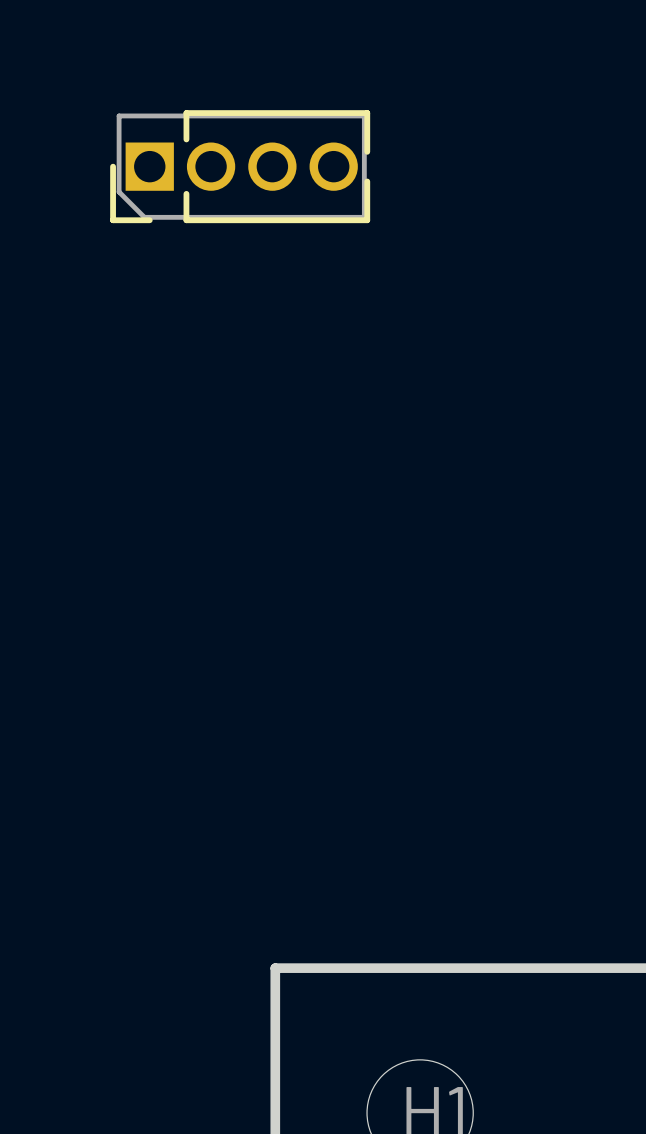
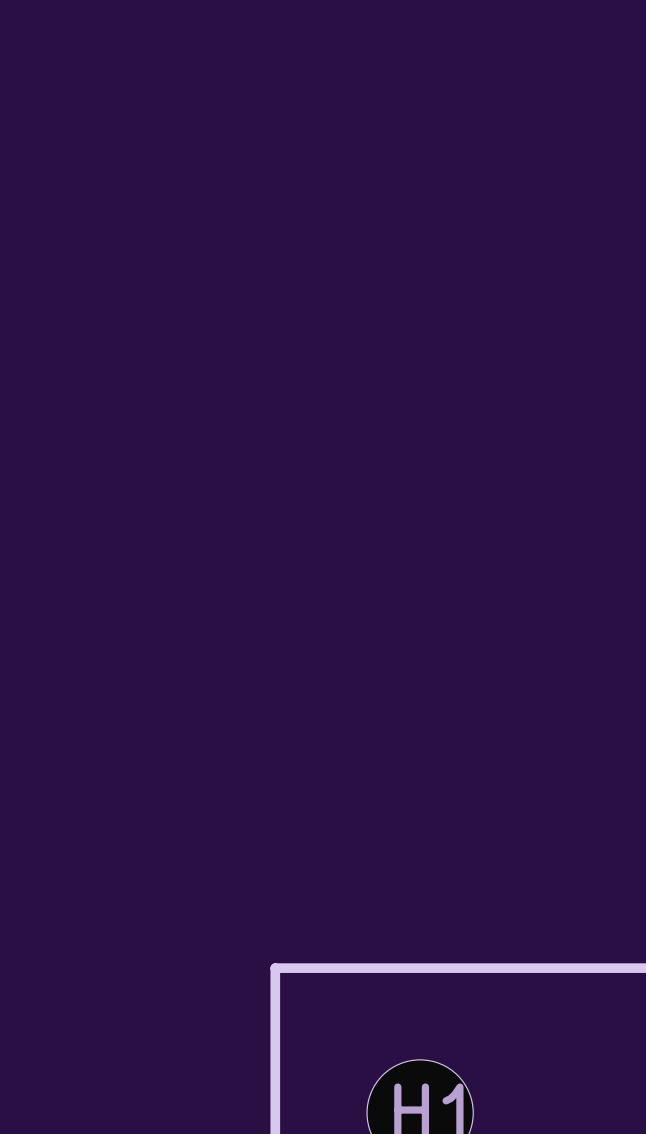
part: (240, 166) -> none

